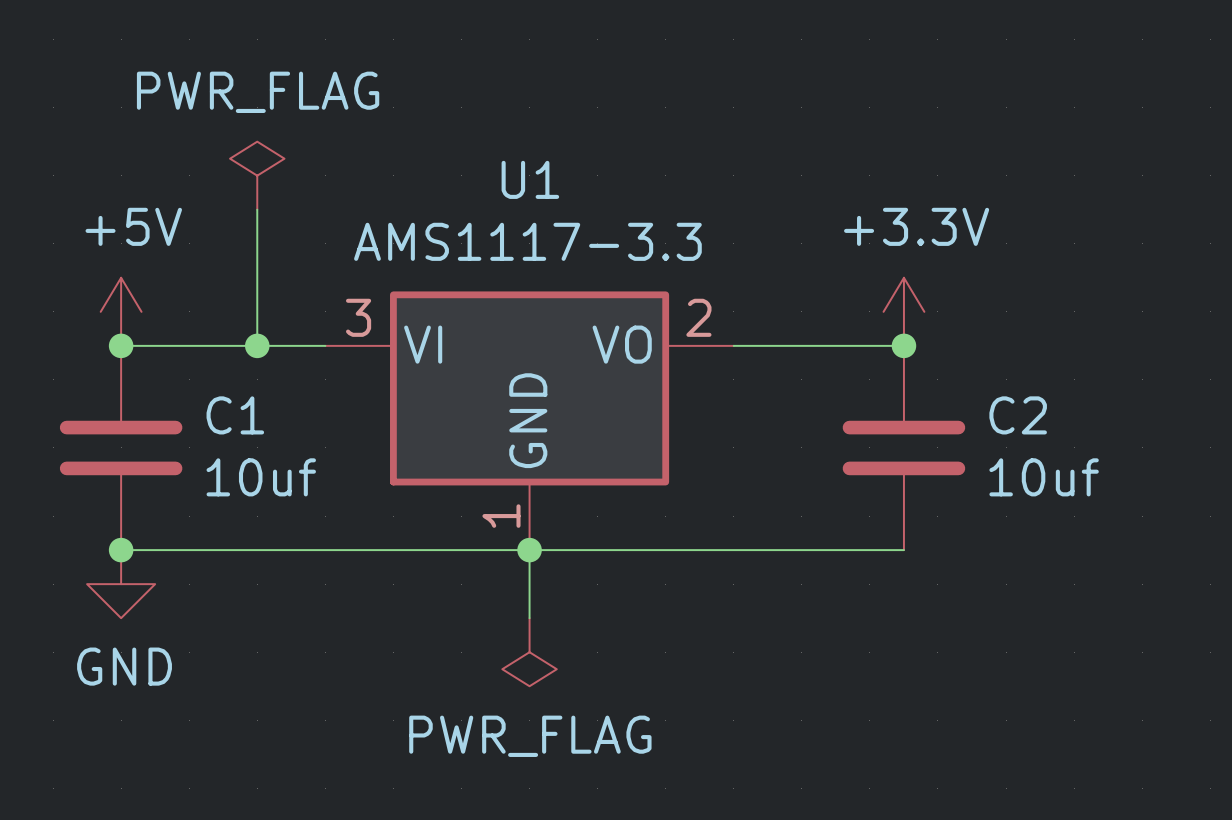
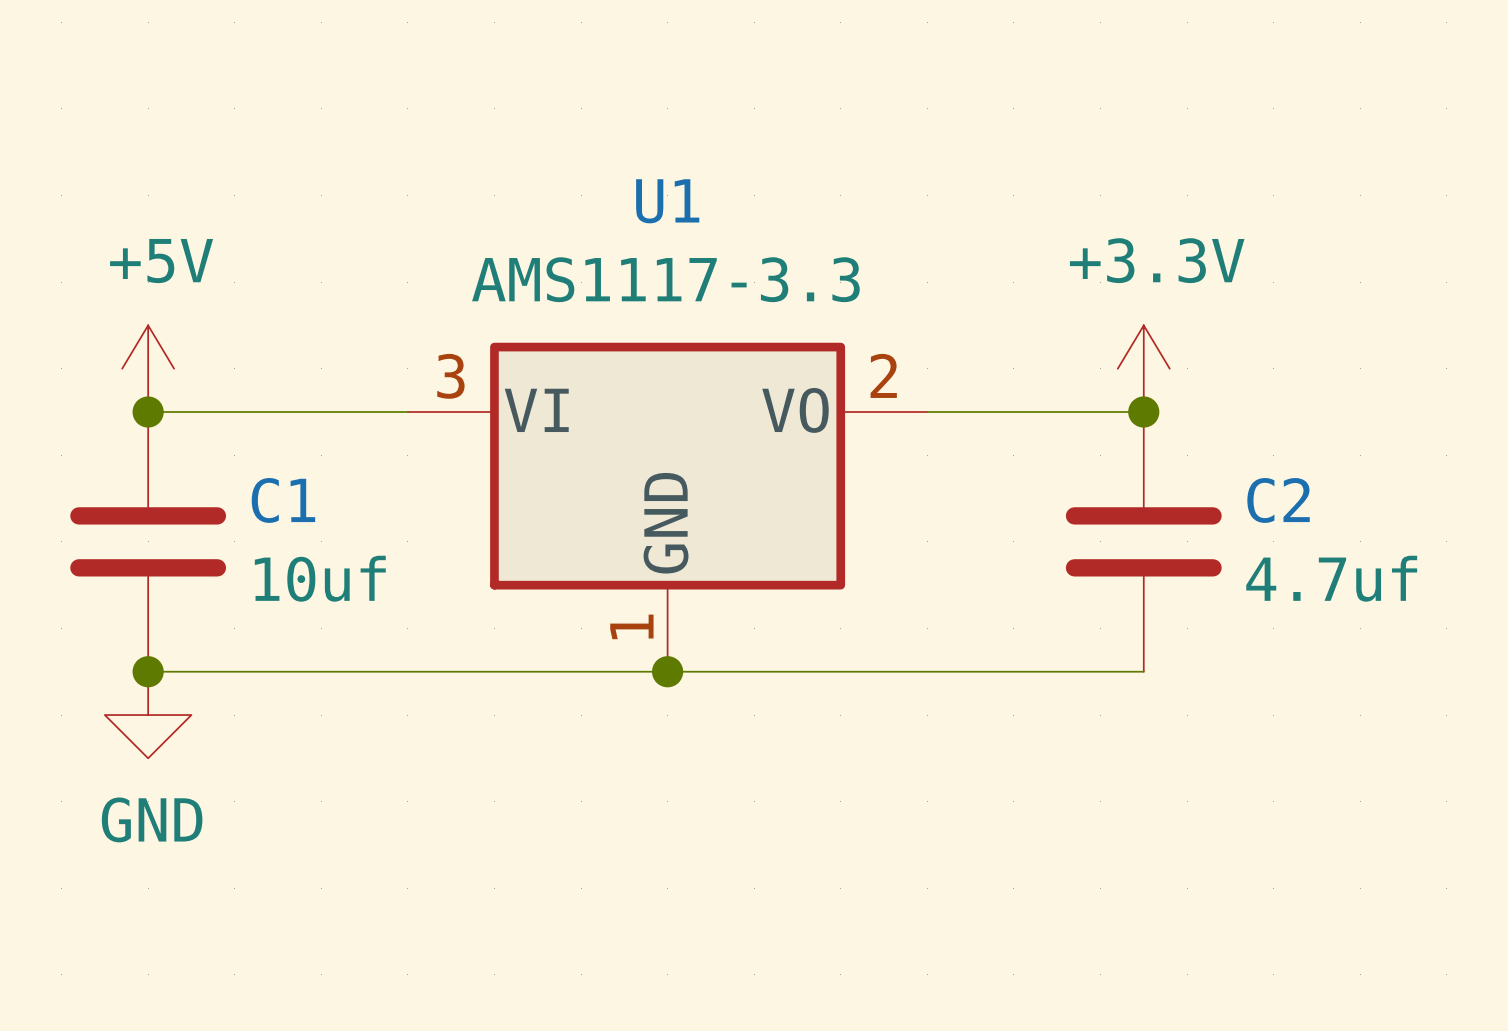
power symbol: PWR_FLAG (257, 175) -> none
wire: (257, 209) (257, 345) -> none
junction: (257, 345) -> none
C2 value: 10uf (1044, 477) -> 4.7uf (1331, 578)
wire: (529, 550) (529, 618) -> none
power symbol: PWR_FLAG (529, 652) -> none

